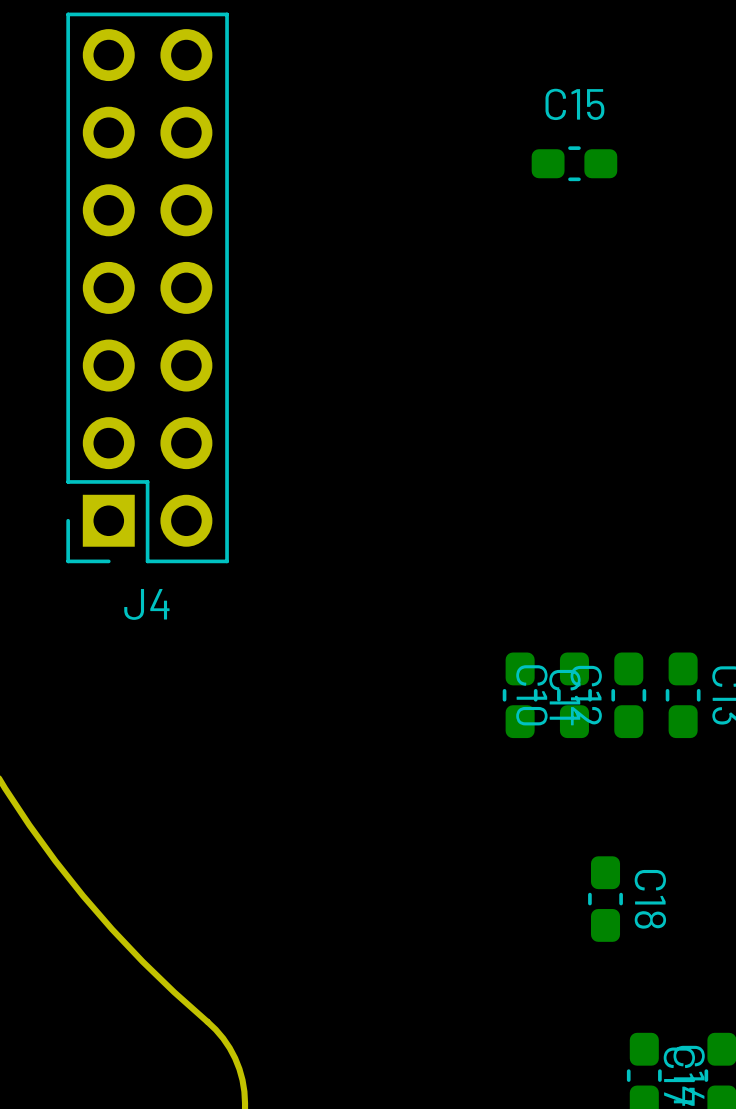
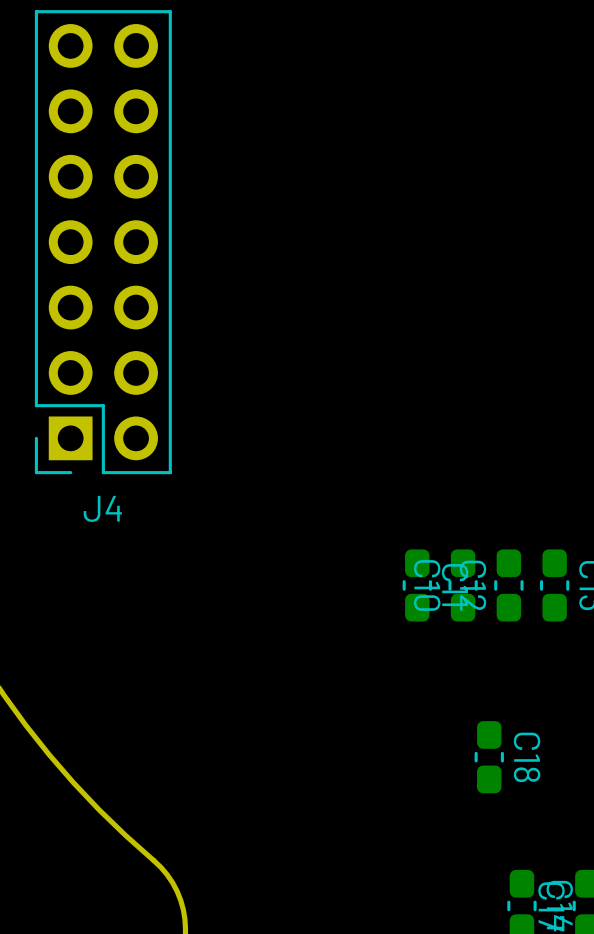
C15: (574, 163) -> none

